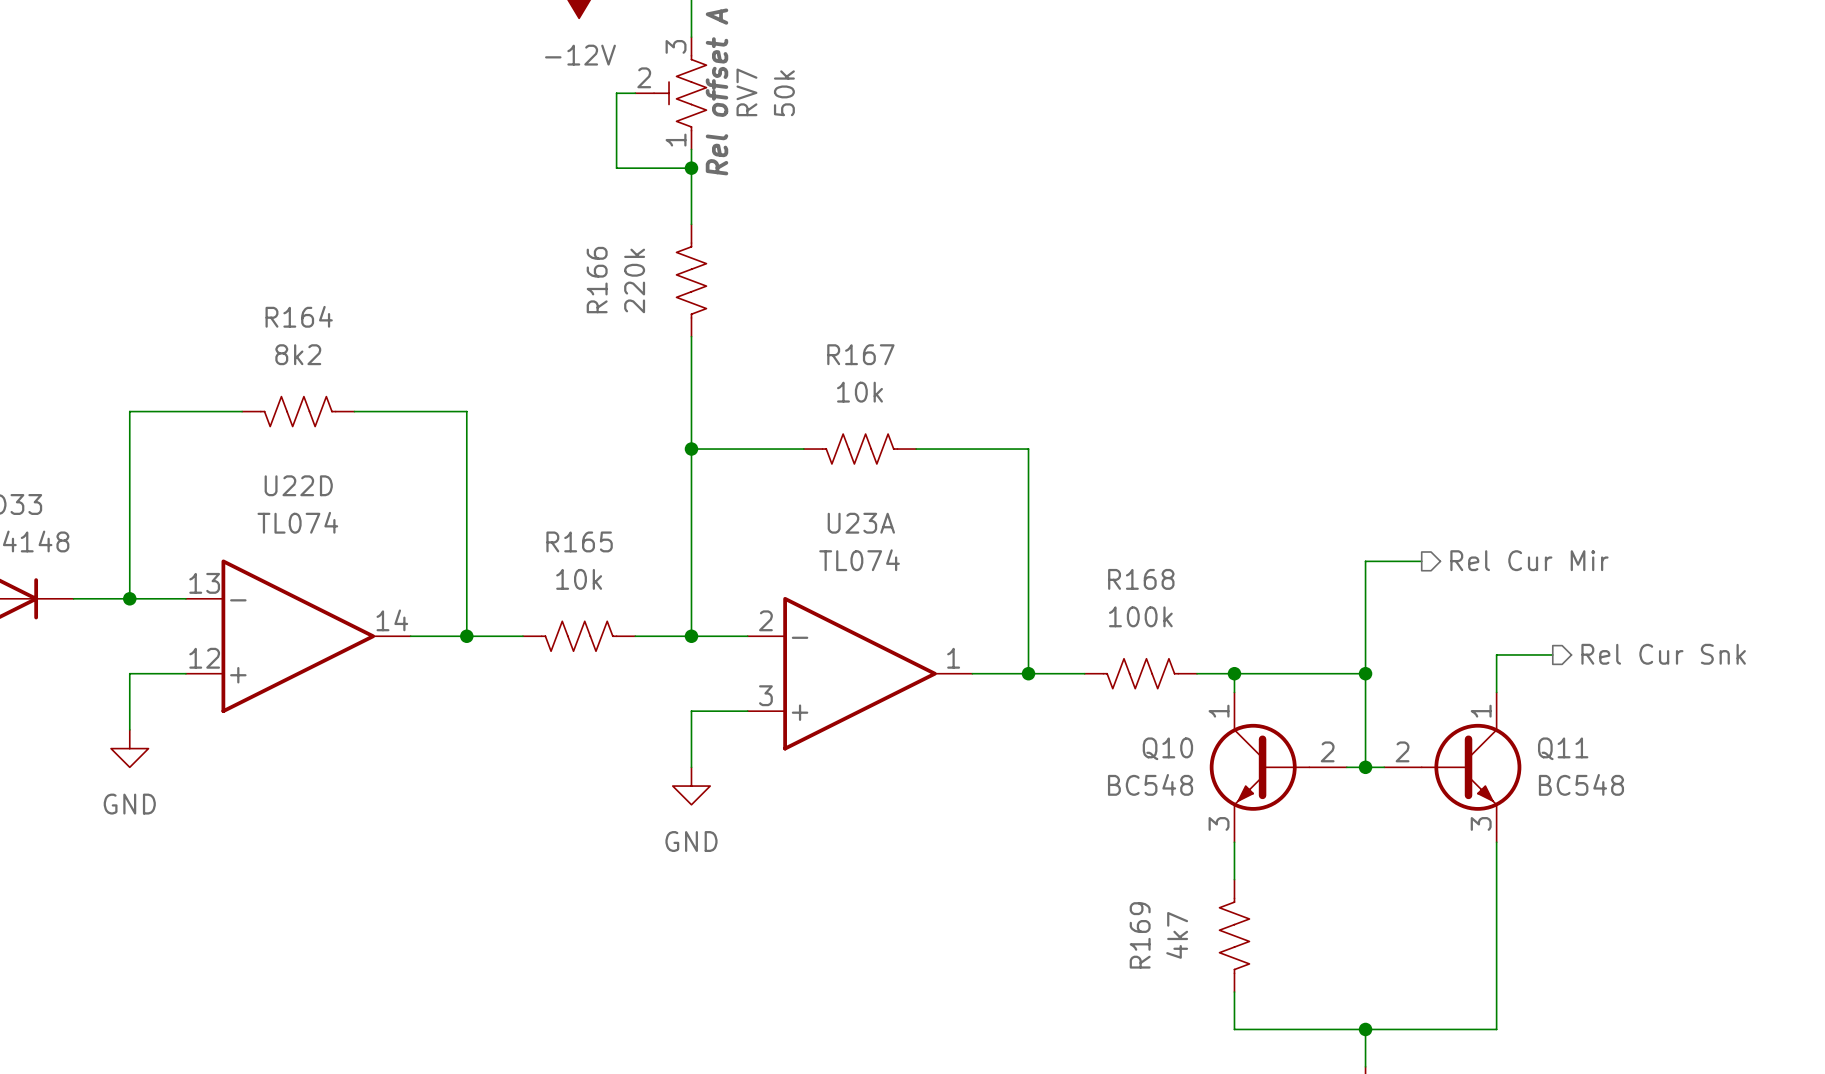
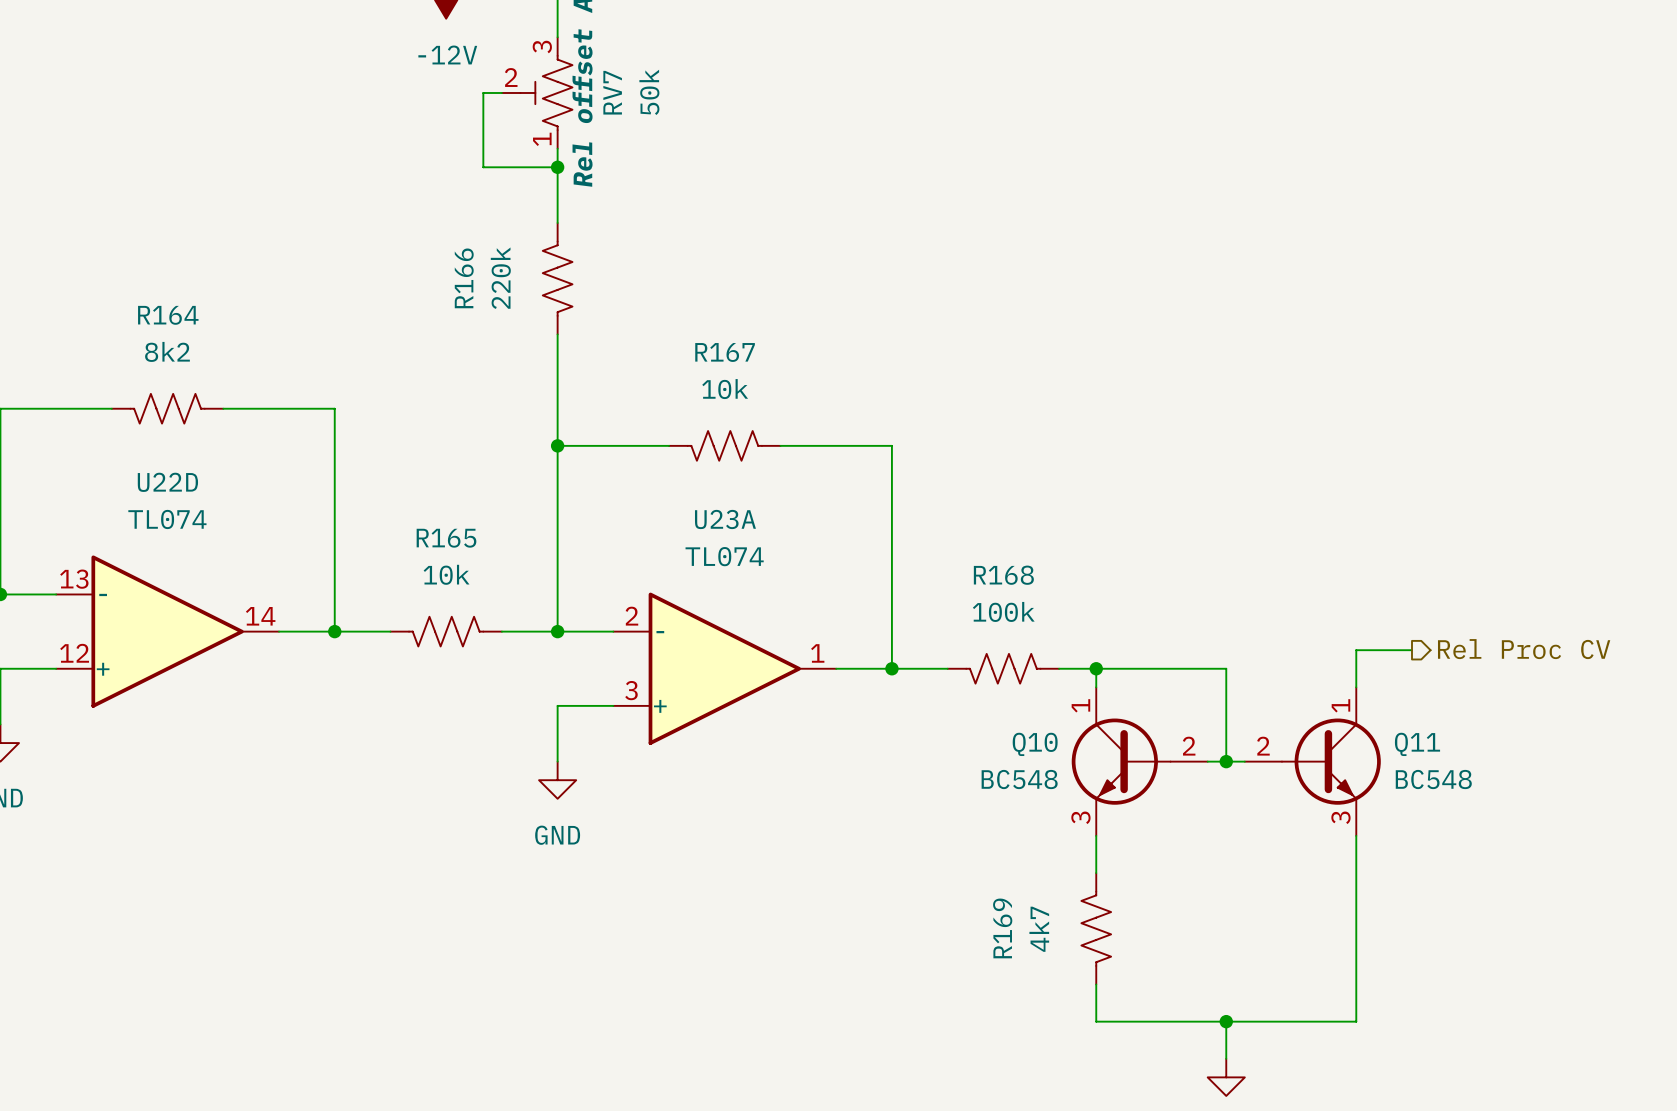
hierarchical label: Rel Cur Mir (1529, 560) -> none
wire: (1421, 561) (1365, 561) (1365, 673) -> none
hierarchical label: Rel Cur Snk (1663, 654) -> Rel Proc CV (1524, 649)
junction: (1365, 673) -> none

